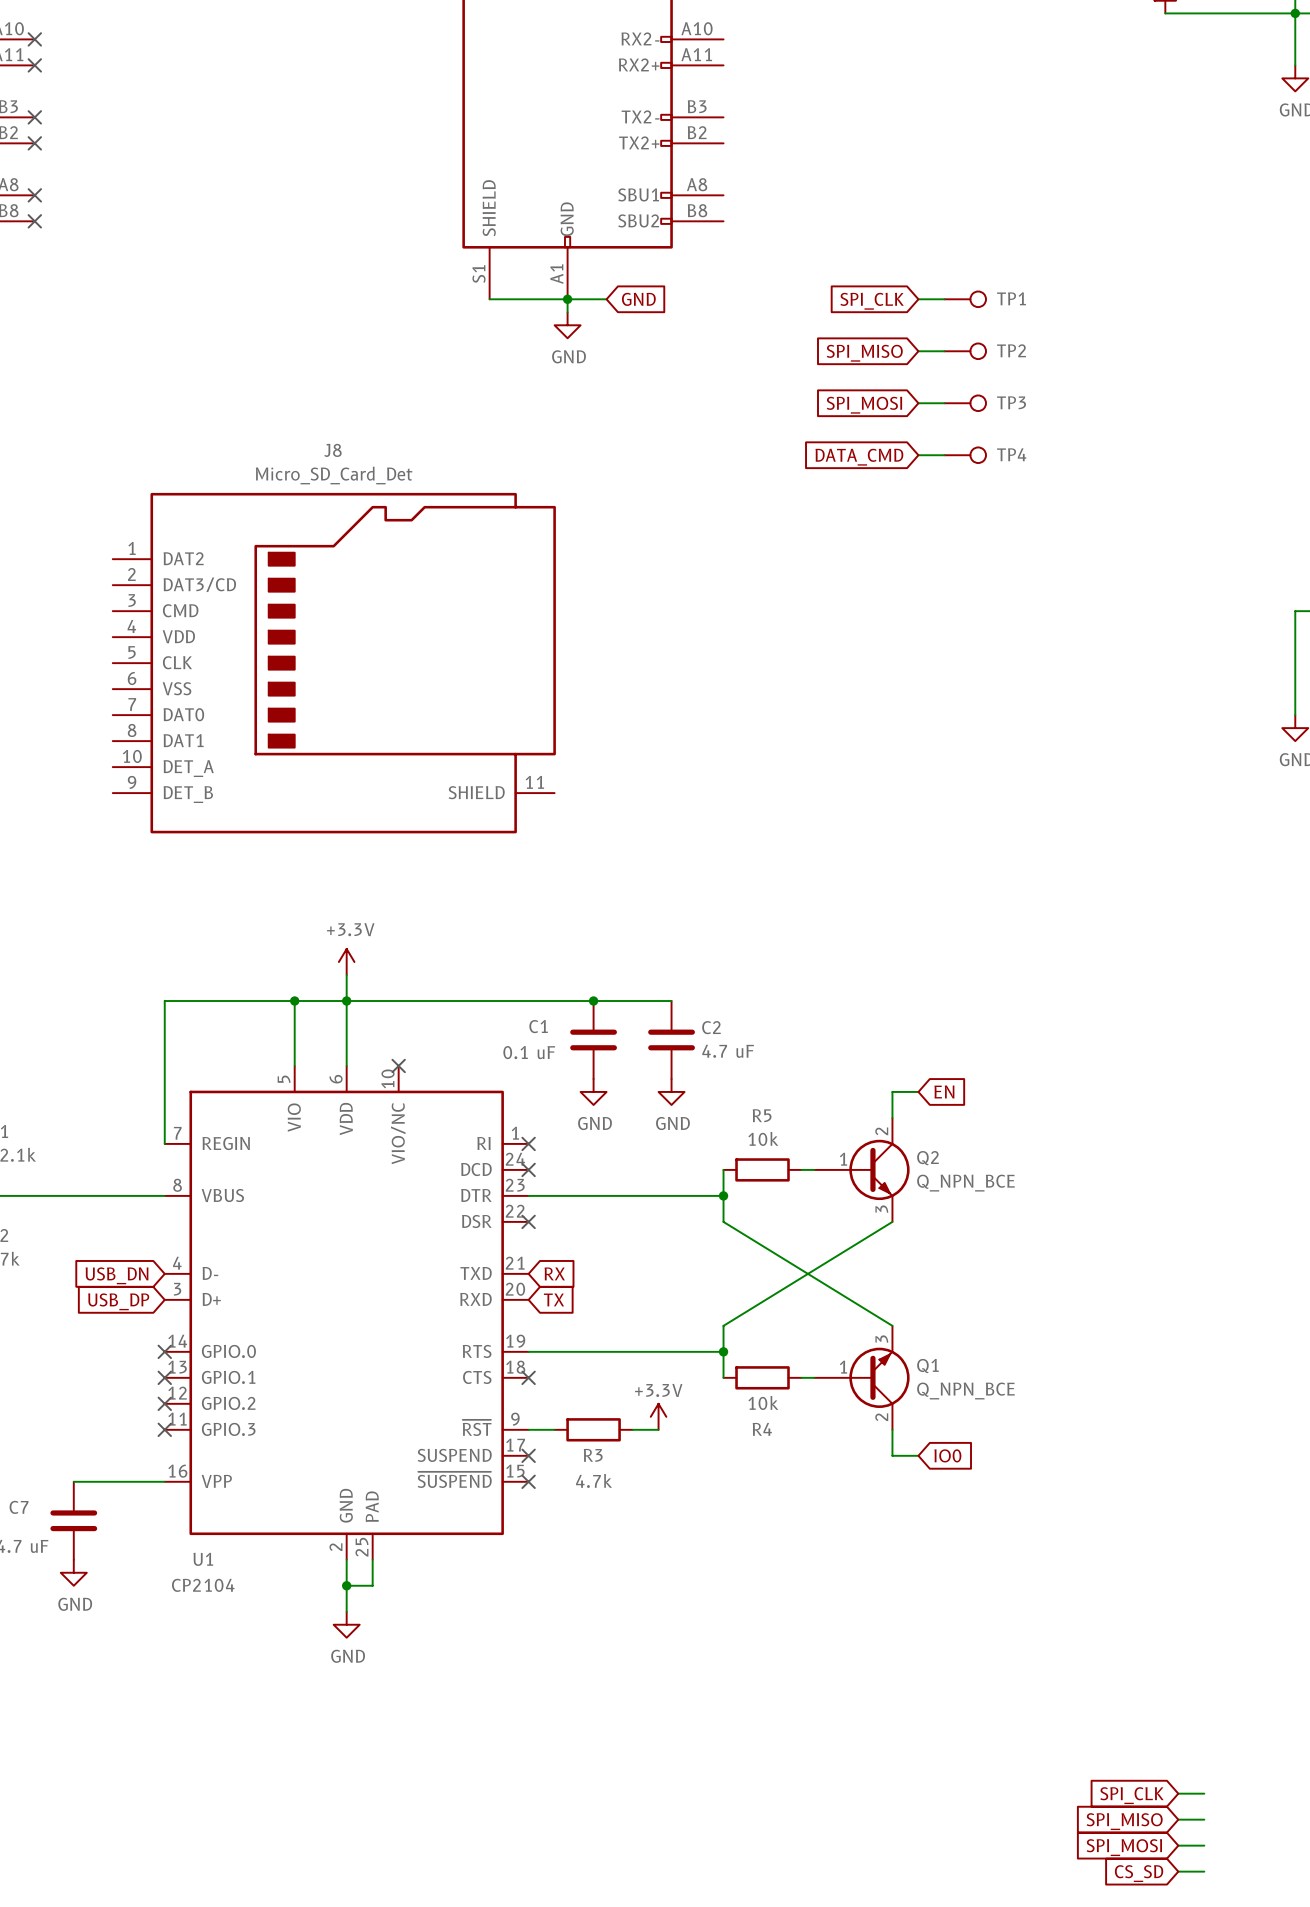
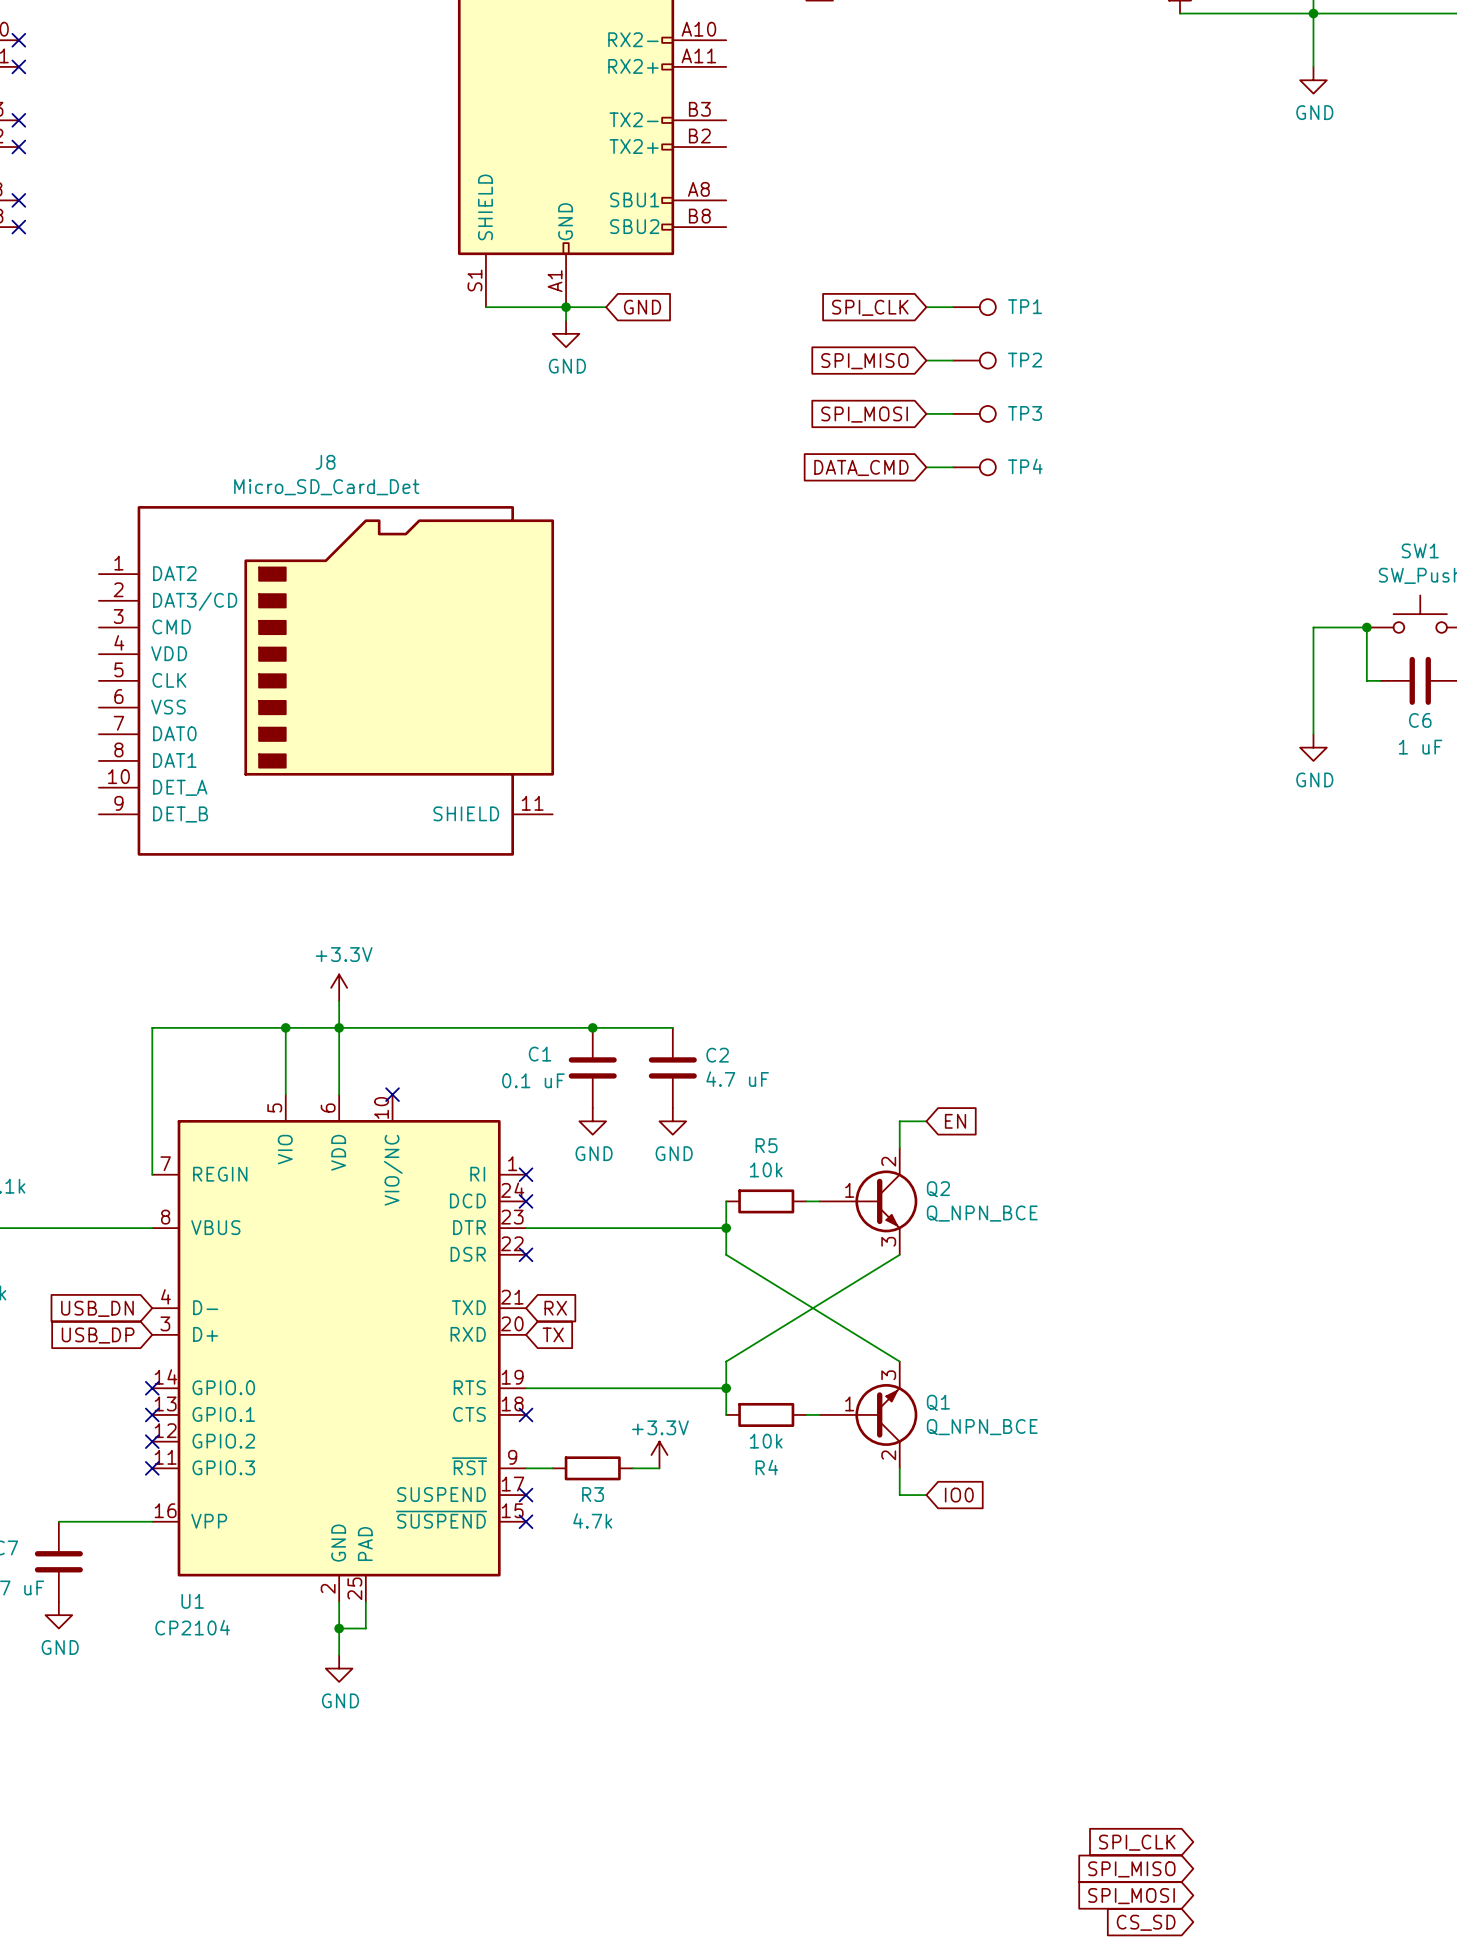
wire: (1178, 1793) (1204, 1793) -> none
wire: (1178, 1819) (1204, 1819) -> none
wire: (1178, 1845) (1204, 1845) -> none
wire: (1178, 1871) (1204, 1871) -> none

